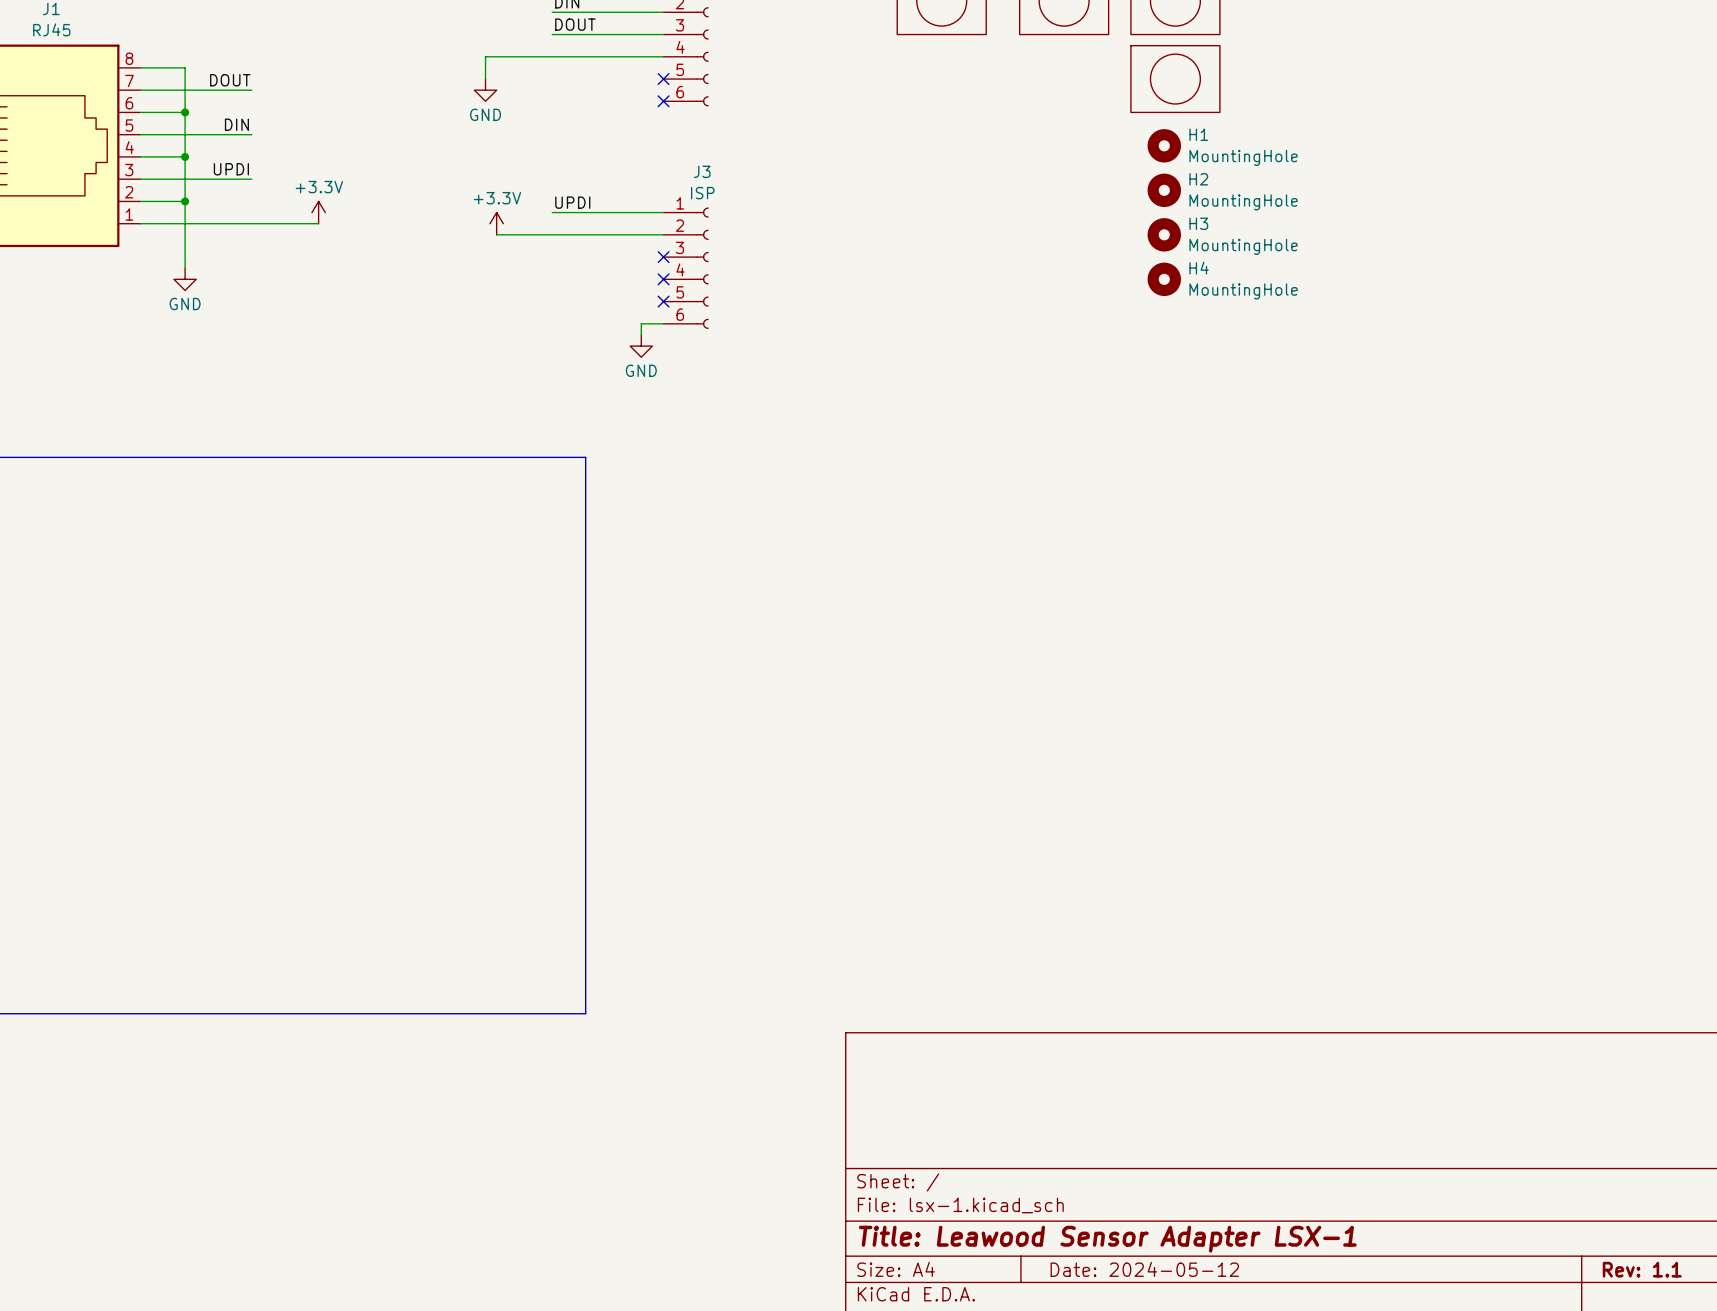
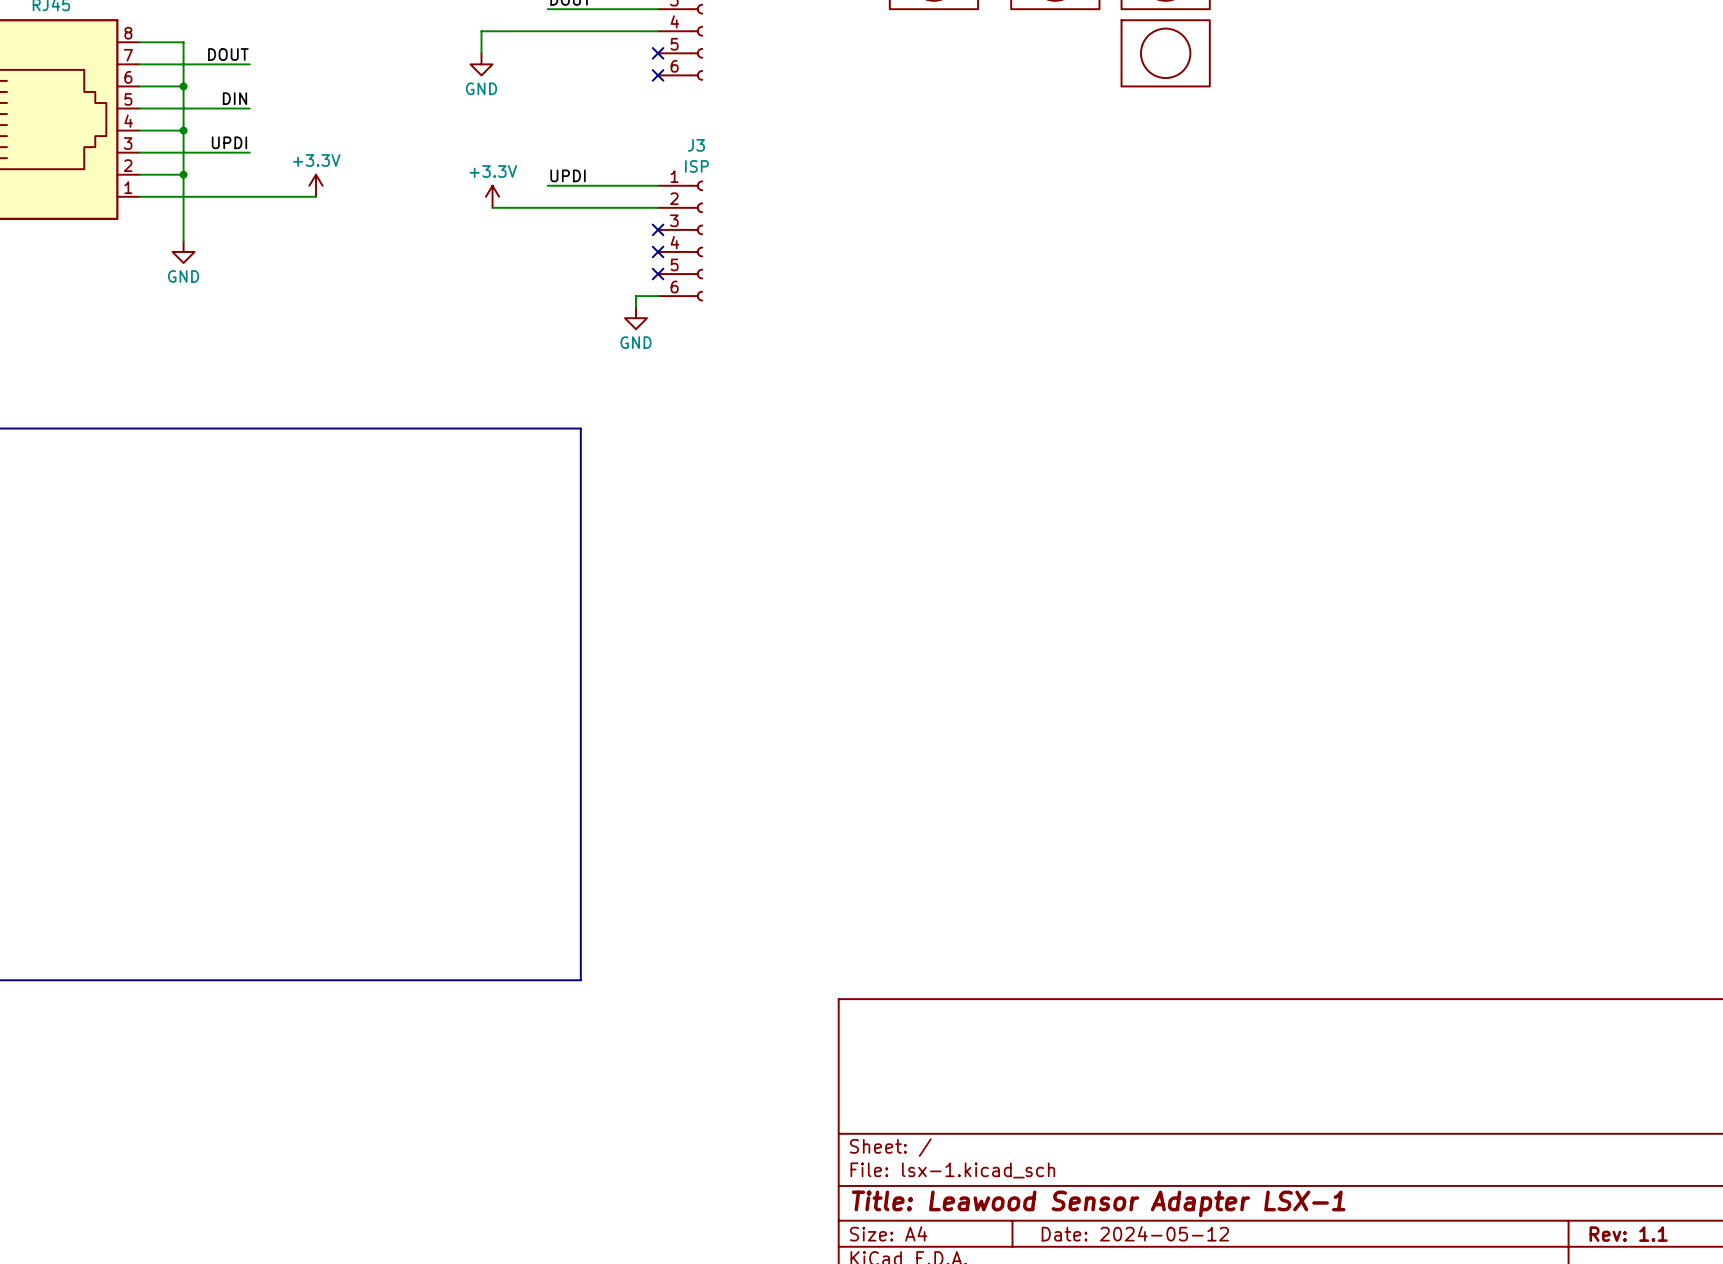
H1: MountingHole (1164, 145) -> none
H2: MountingHole (1164, 190) -> none
H3: MountingHole (1164, 234) -> none
H4: MountingHole (1164, 279) -> none

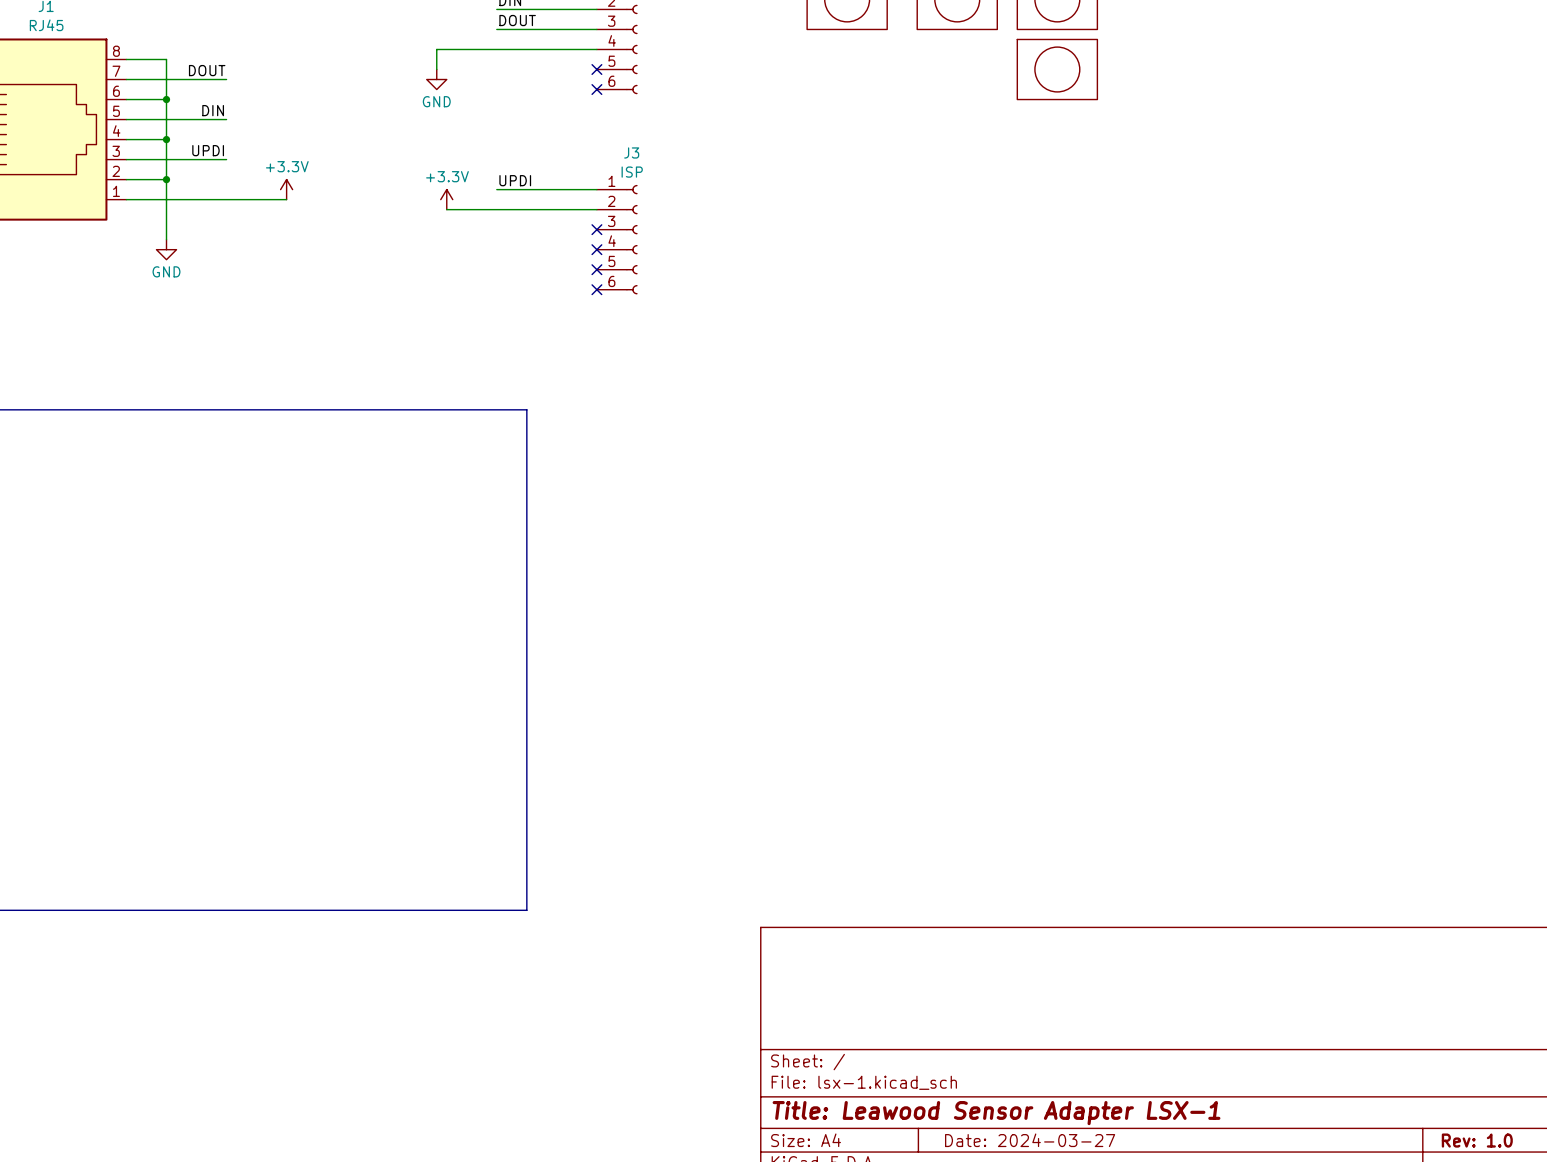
wire: (658, 296) (635, 296) (635, 307) -> none
no-connect mark: none -> (596, 289)
power symbol: GND (635, 318) -> none
title block: Date: 2024-05-12 (1135, 1233) -> Date: 2024-03-27 (1030, 1140)
title block: Rev: 1.1 (1628, 1234) -> Rev: 1.0 (1477, 1140)

